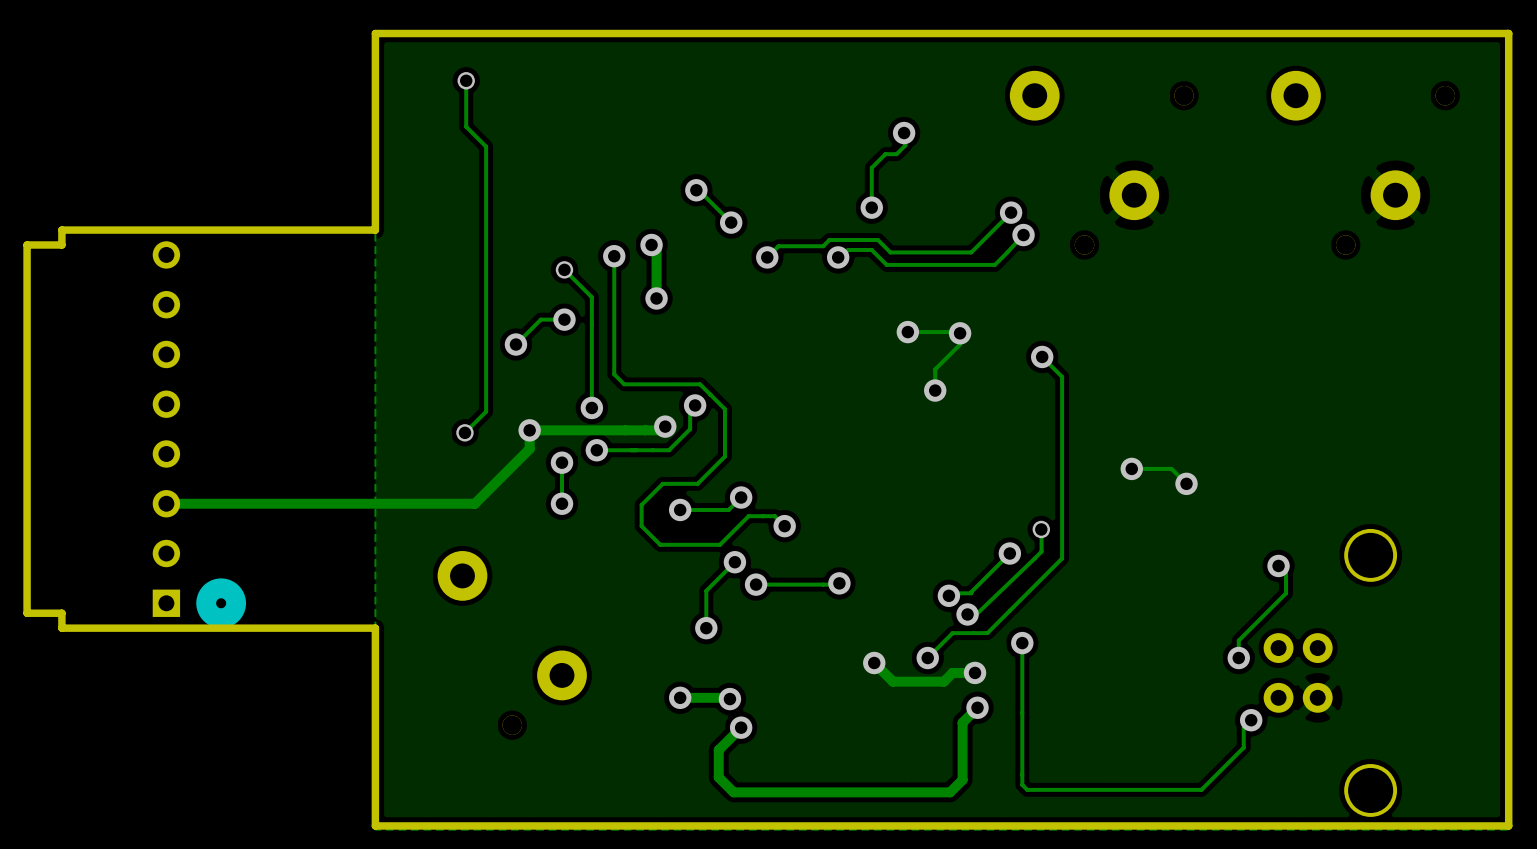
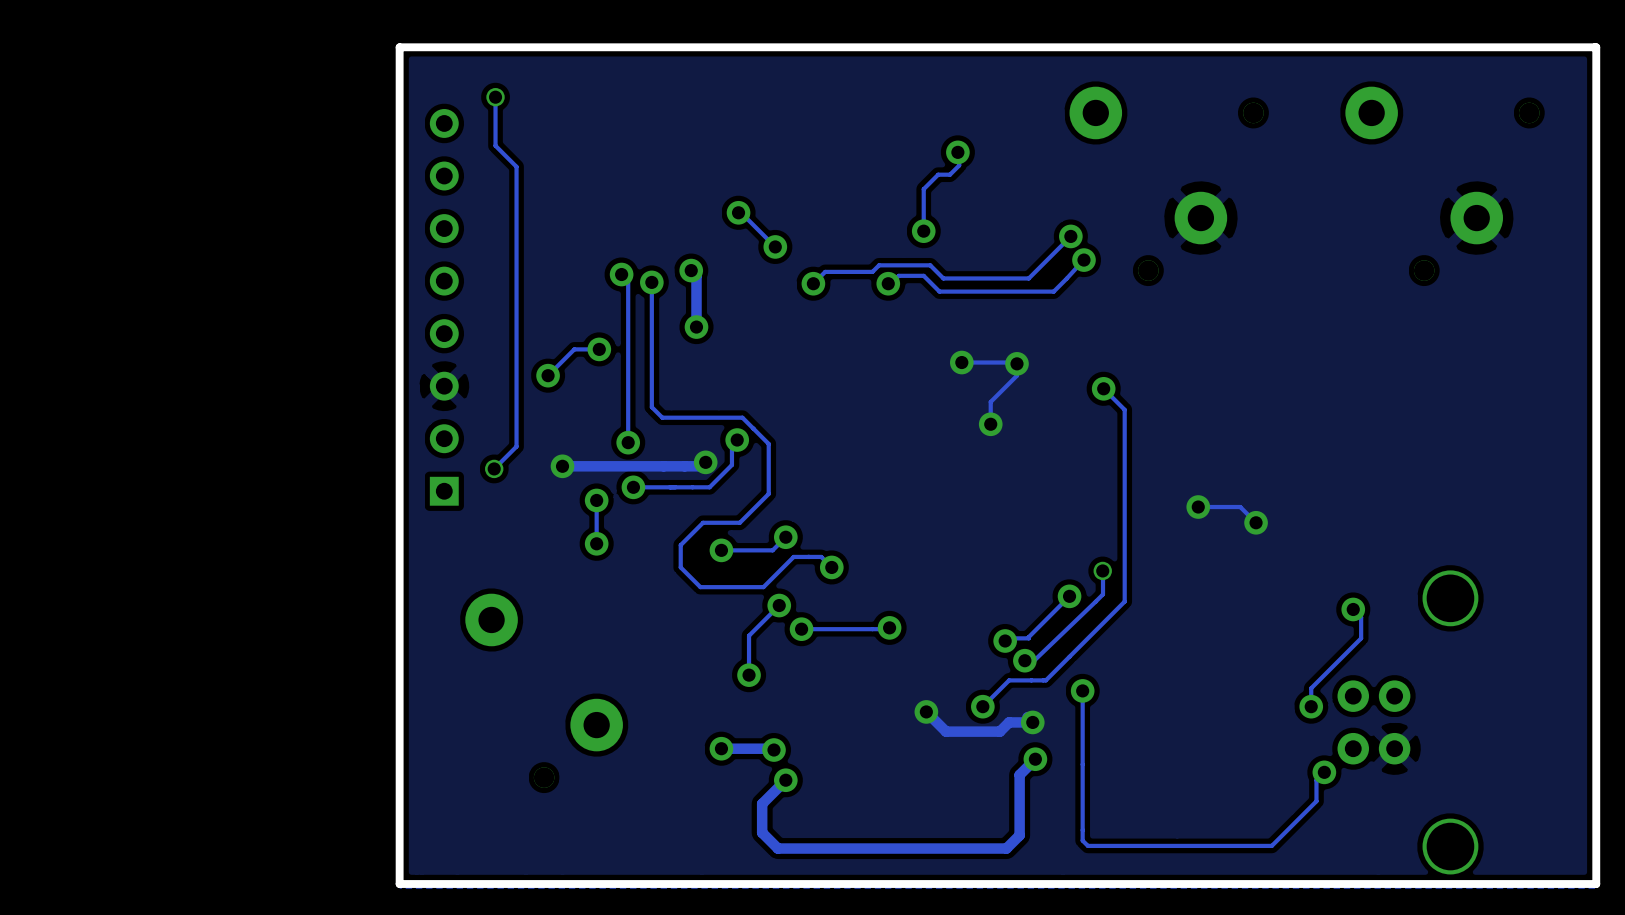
board edge: (375, 230) (61, 230) (61, 244) (27, 244) (27, 613) (61, 613) (61, 628) (375, 628) -> (399, 254) (399, 675)
via: none -> (621, 274)
track: (564, 269) (591, 297) -> (621, 274) (628, 279) (628, 325)
via: (564, 269) -> none
part position: (166, 429) -> (444, 307)
track: (529, 430) (529, 449) (474, 503) (166, 503) -> none
drawing: [196, 578, 247, 629] -> none

